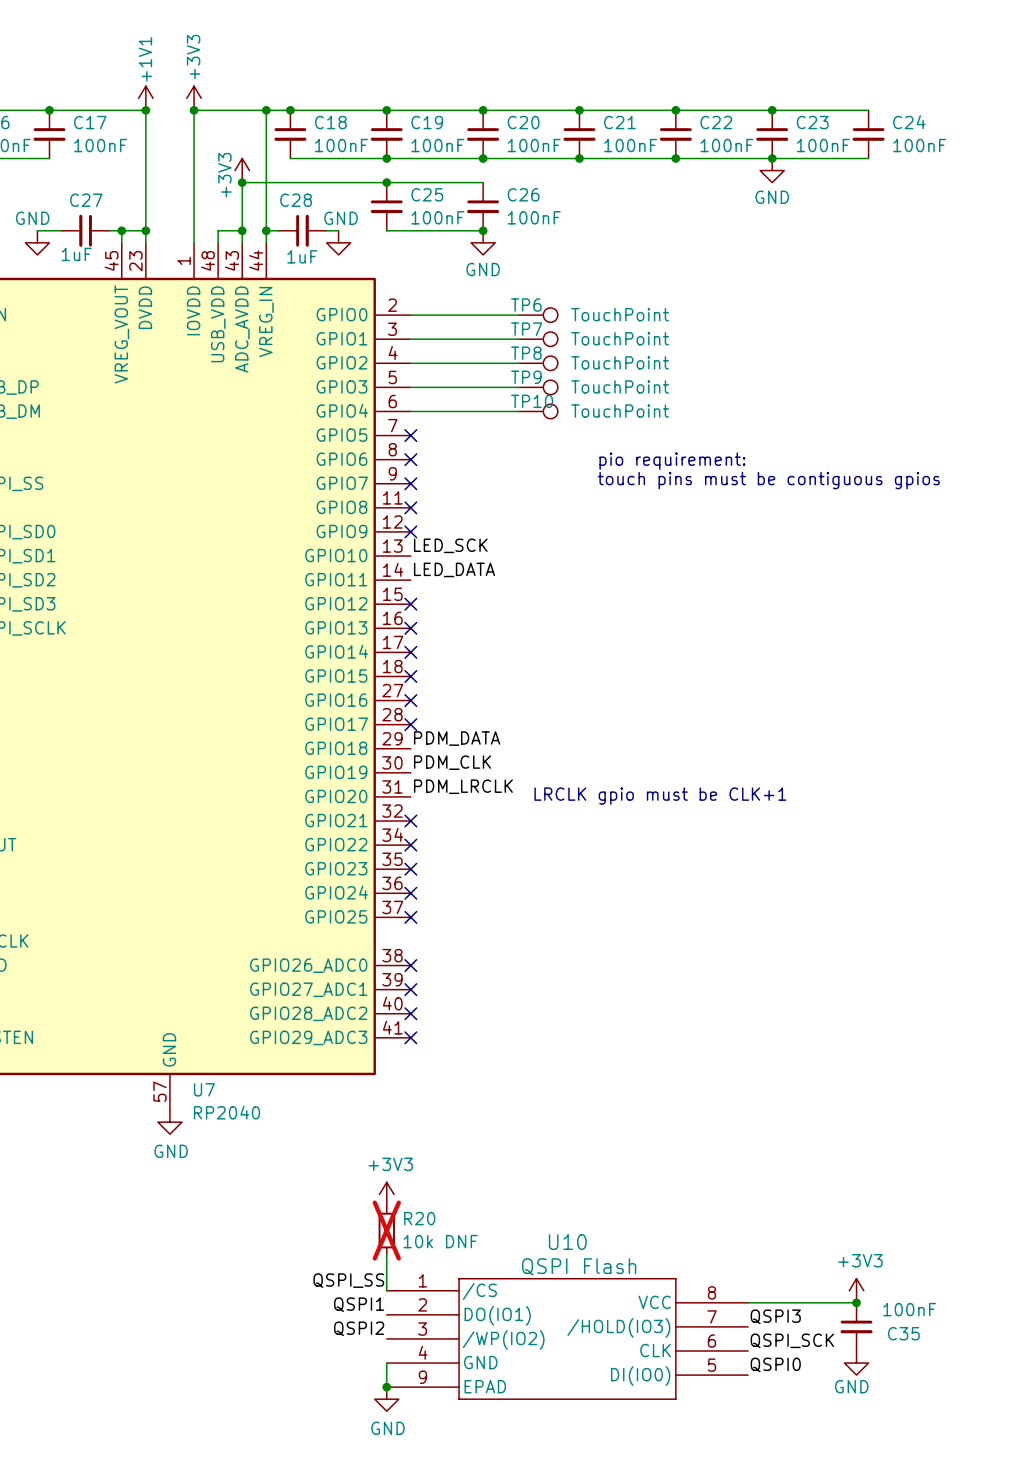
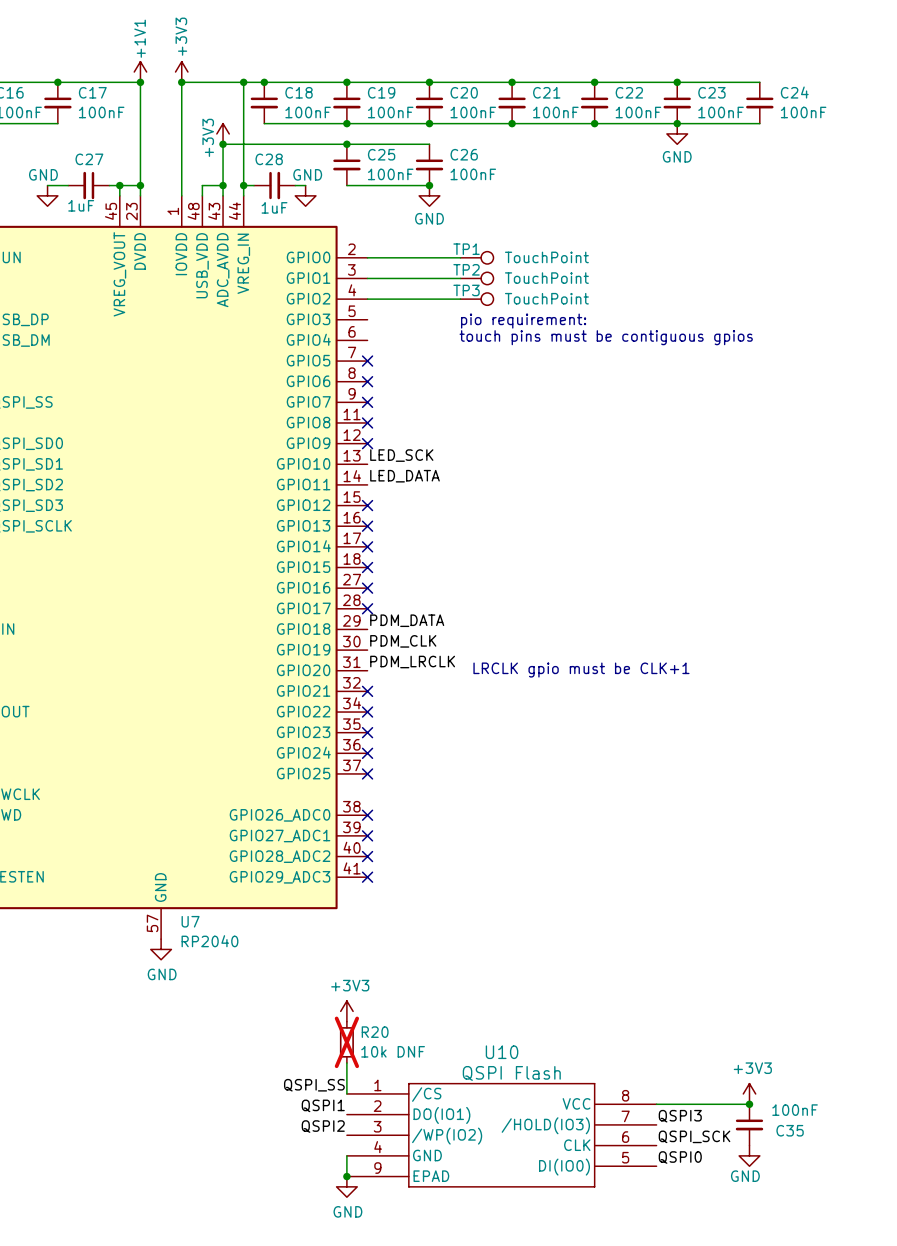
TP6 name: TP6 (526, 305) -> TP1 (466, 249)
TP7 name: TP7 (526, 329) -> TP2 (466, 269)
TP8 name: TP8 (526, 353) -> TP3 (466, 290)
wire: (410, 387) (519, 387) -> none
TP9: TouchPoint (538, 387) -> none
wire: (410, 411) (519, 411) -> none
TP10: TouchPoint (538, 411) -> none
text position: pio requirement: (672, 461) -> pio requirement: (523, 321)
text position: touch pins must be contiguous gpios (768, 480) -> touch pins must be contiguous gpios (606, 337)

